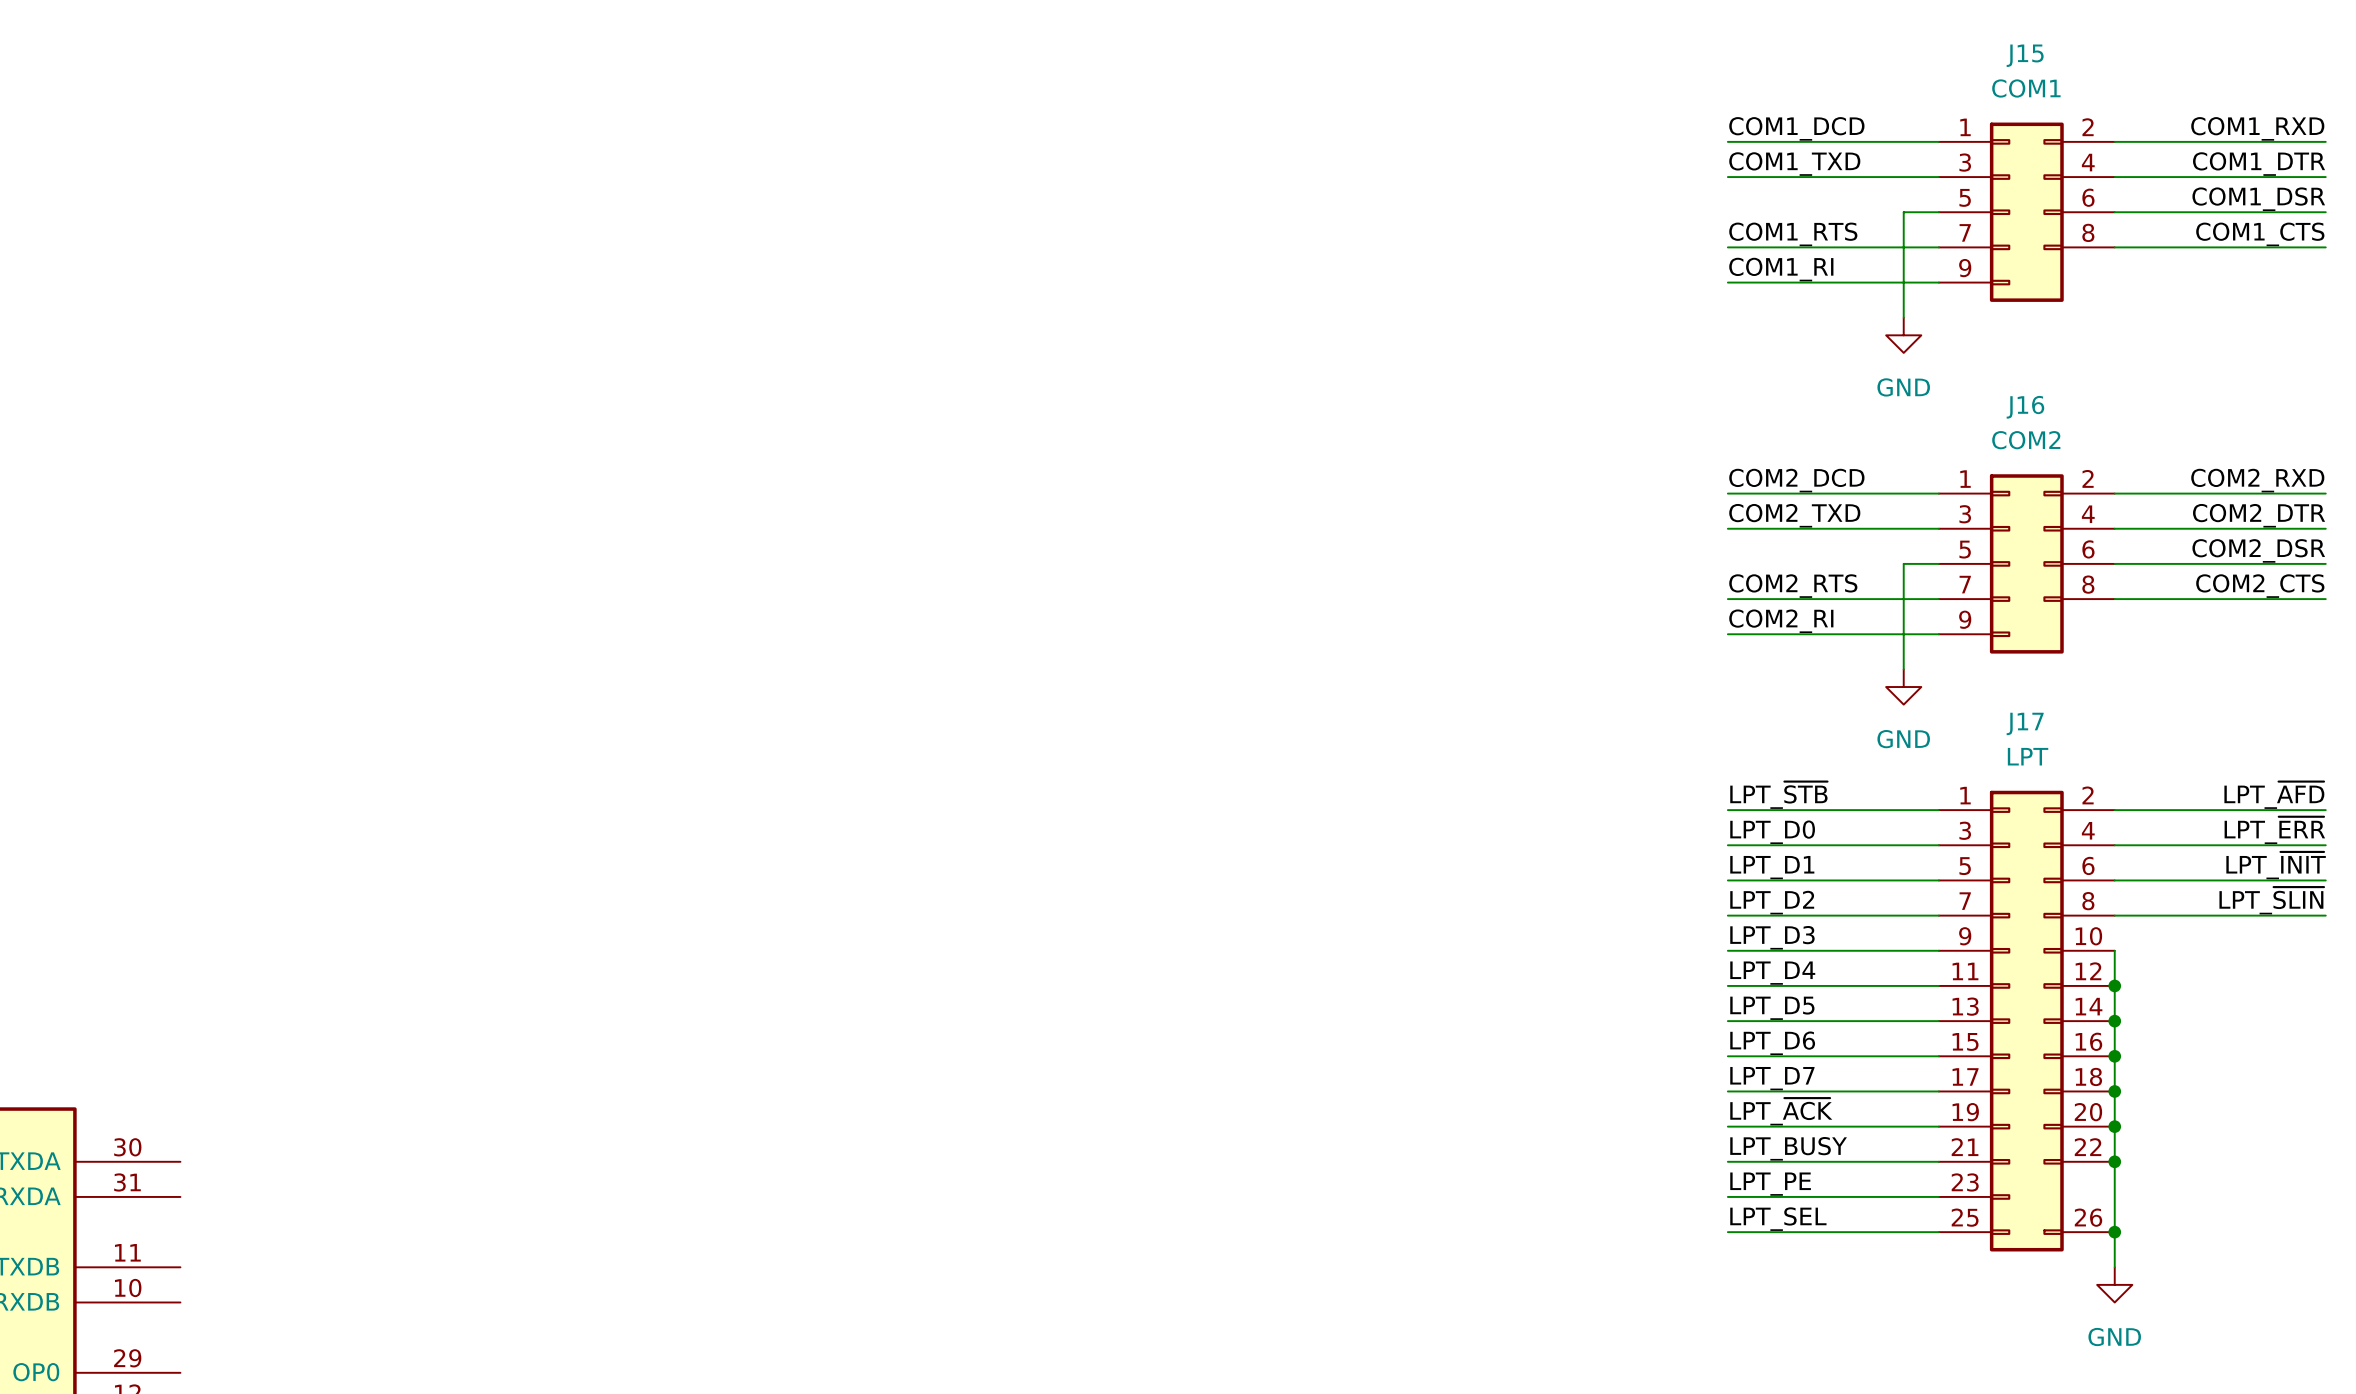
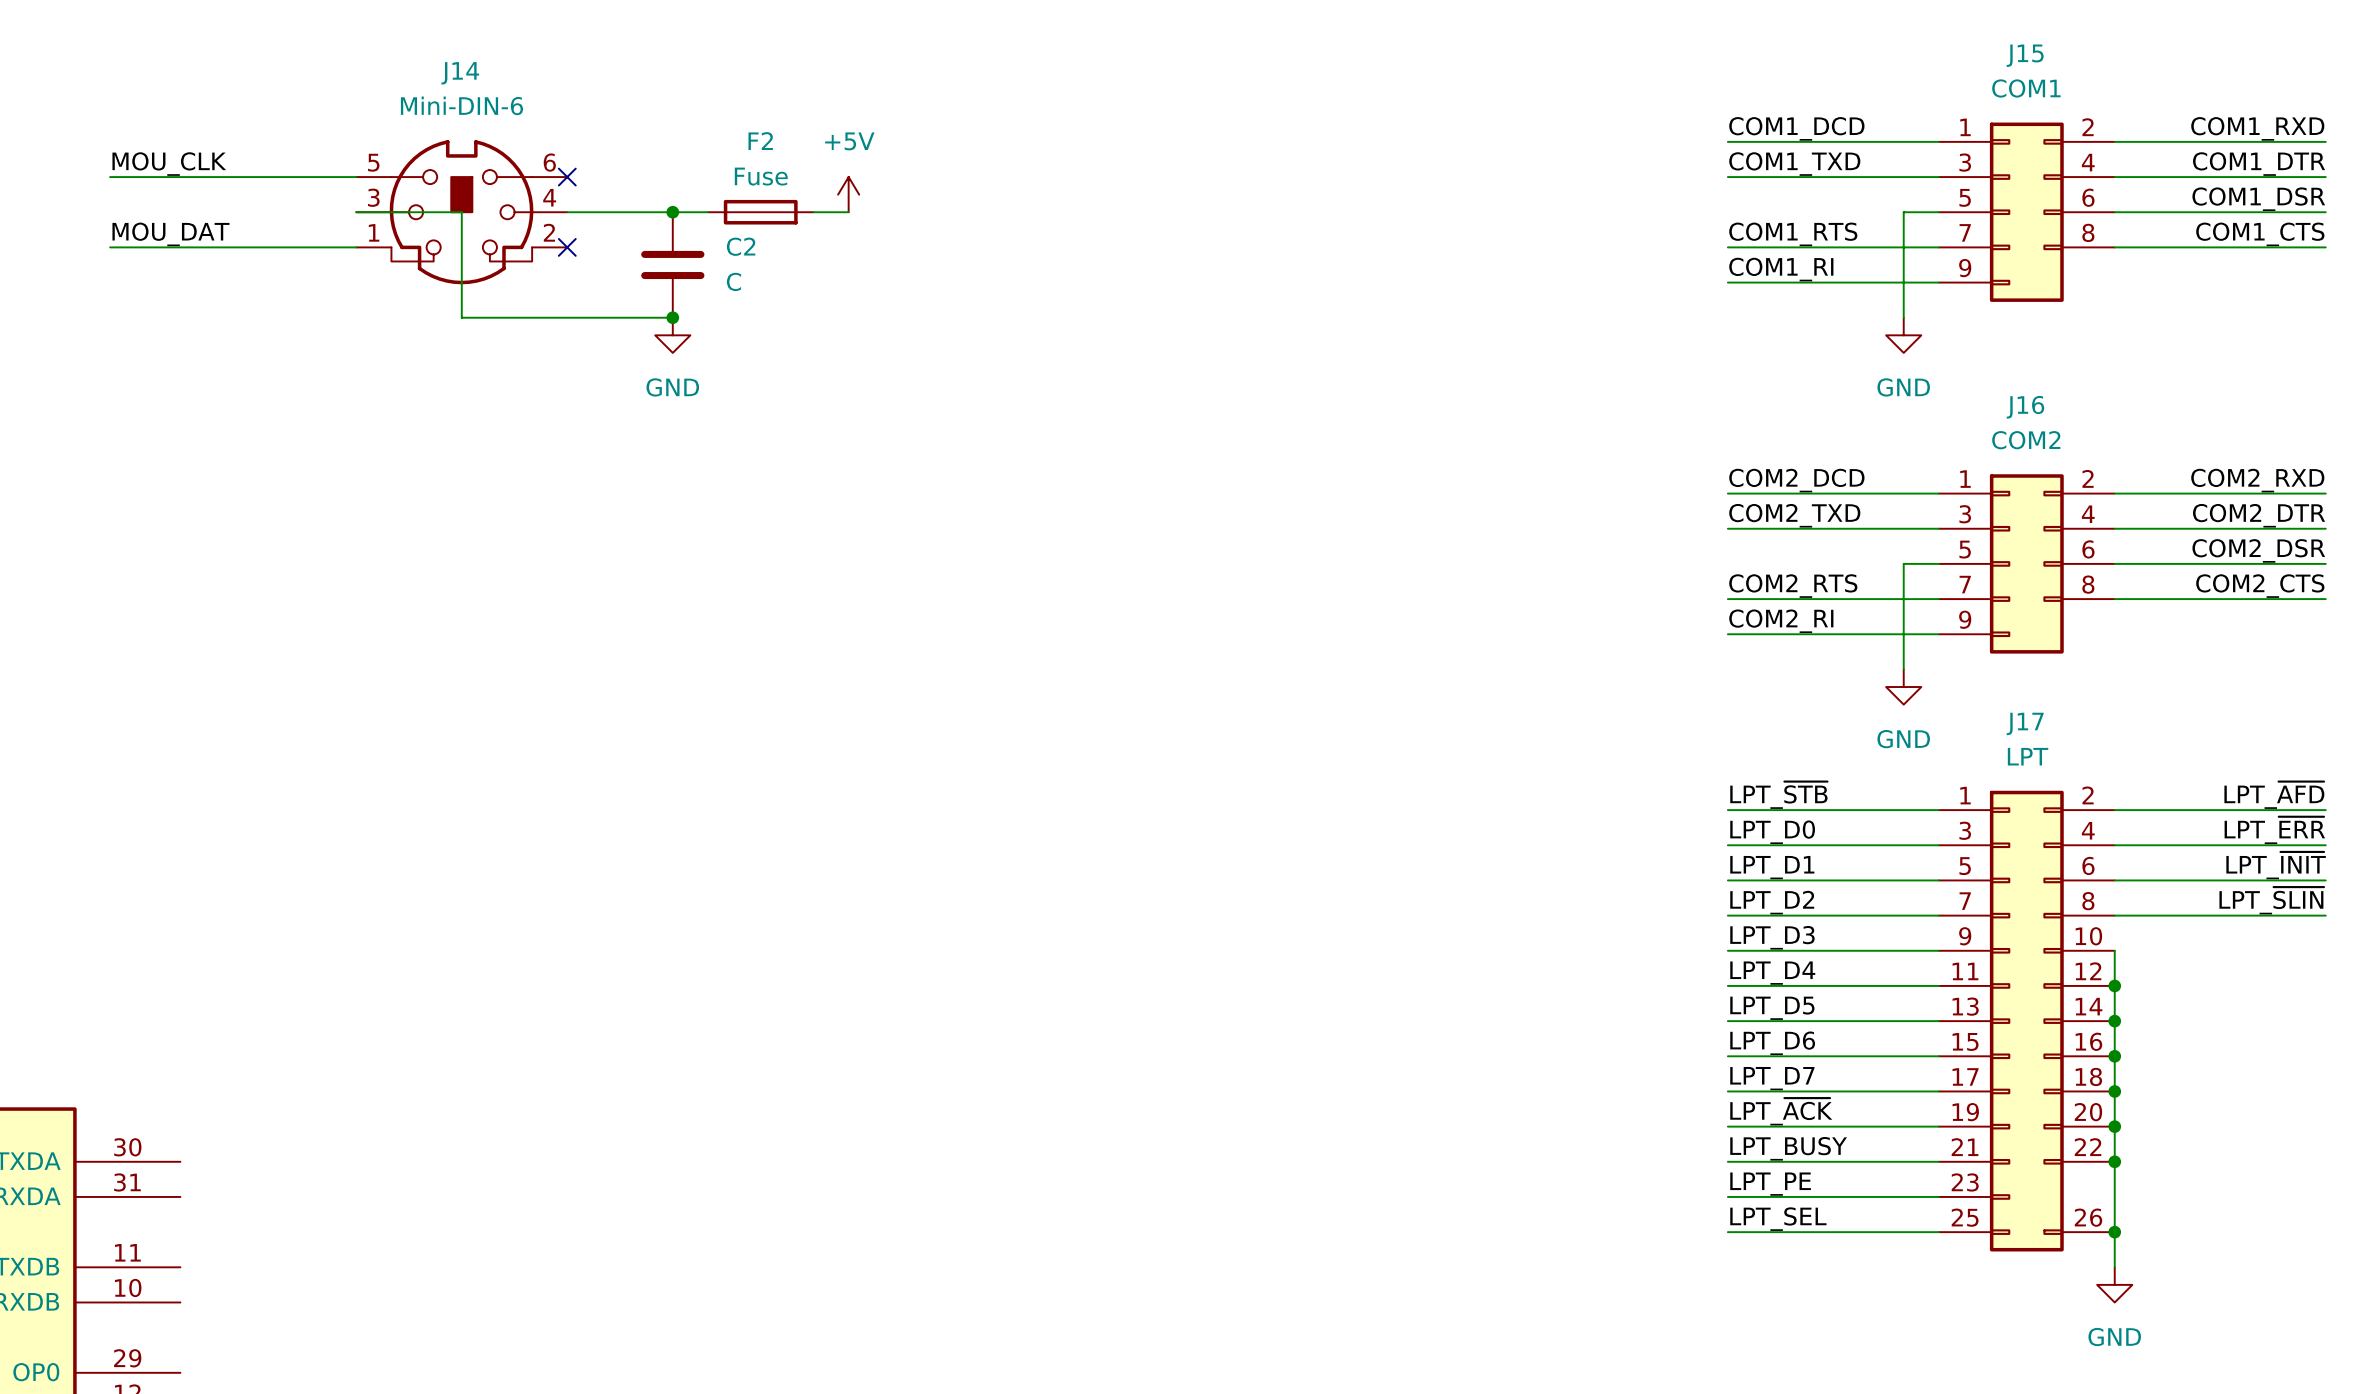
label: none -> MOU_CLK (169, 164)
wire: none -> (110, 177) (356, 177)
no-connect mark: none -> (567, 177)
power symbol: none -> +5V (848, 194)
wire: none -> (356, 212) (461, 212) (461, 317) (672, 317)
J14: none -> Mini-DIN-6 (461, 212)
wire: none -> (567, 212) (707, 212)
junction: none -> (672, 212)
F2: none -> Fuse (760, 212)
wire: none -> (813, 212) (848, 212)
label: none -> MOU_DAT (170, 234)
wire: none -> (110, 247) (356, 247)
no-connect mark: none -> (567, 247)
C2: none -> C (672, 264)
junction: none -> (672, 317)
power symbol: none -> GND (672, 335)

